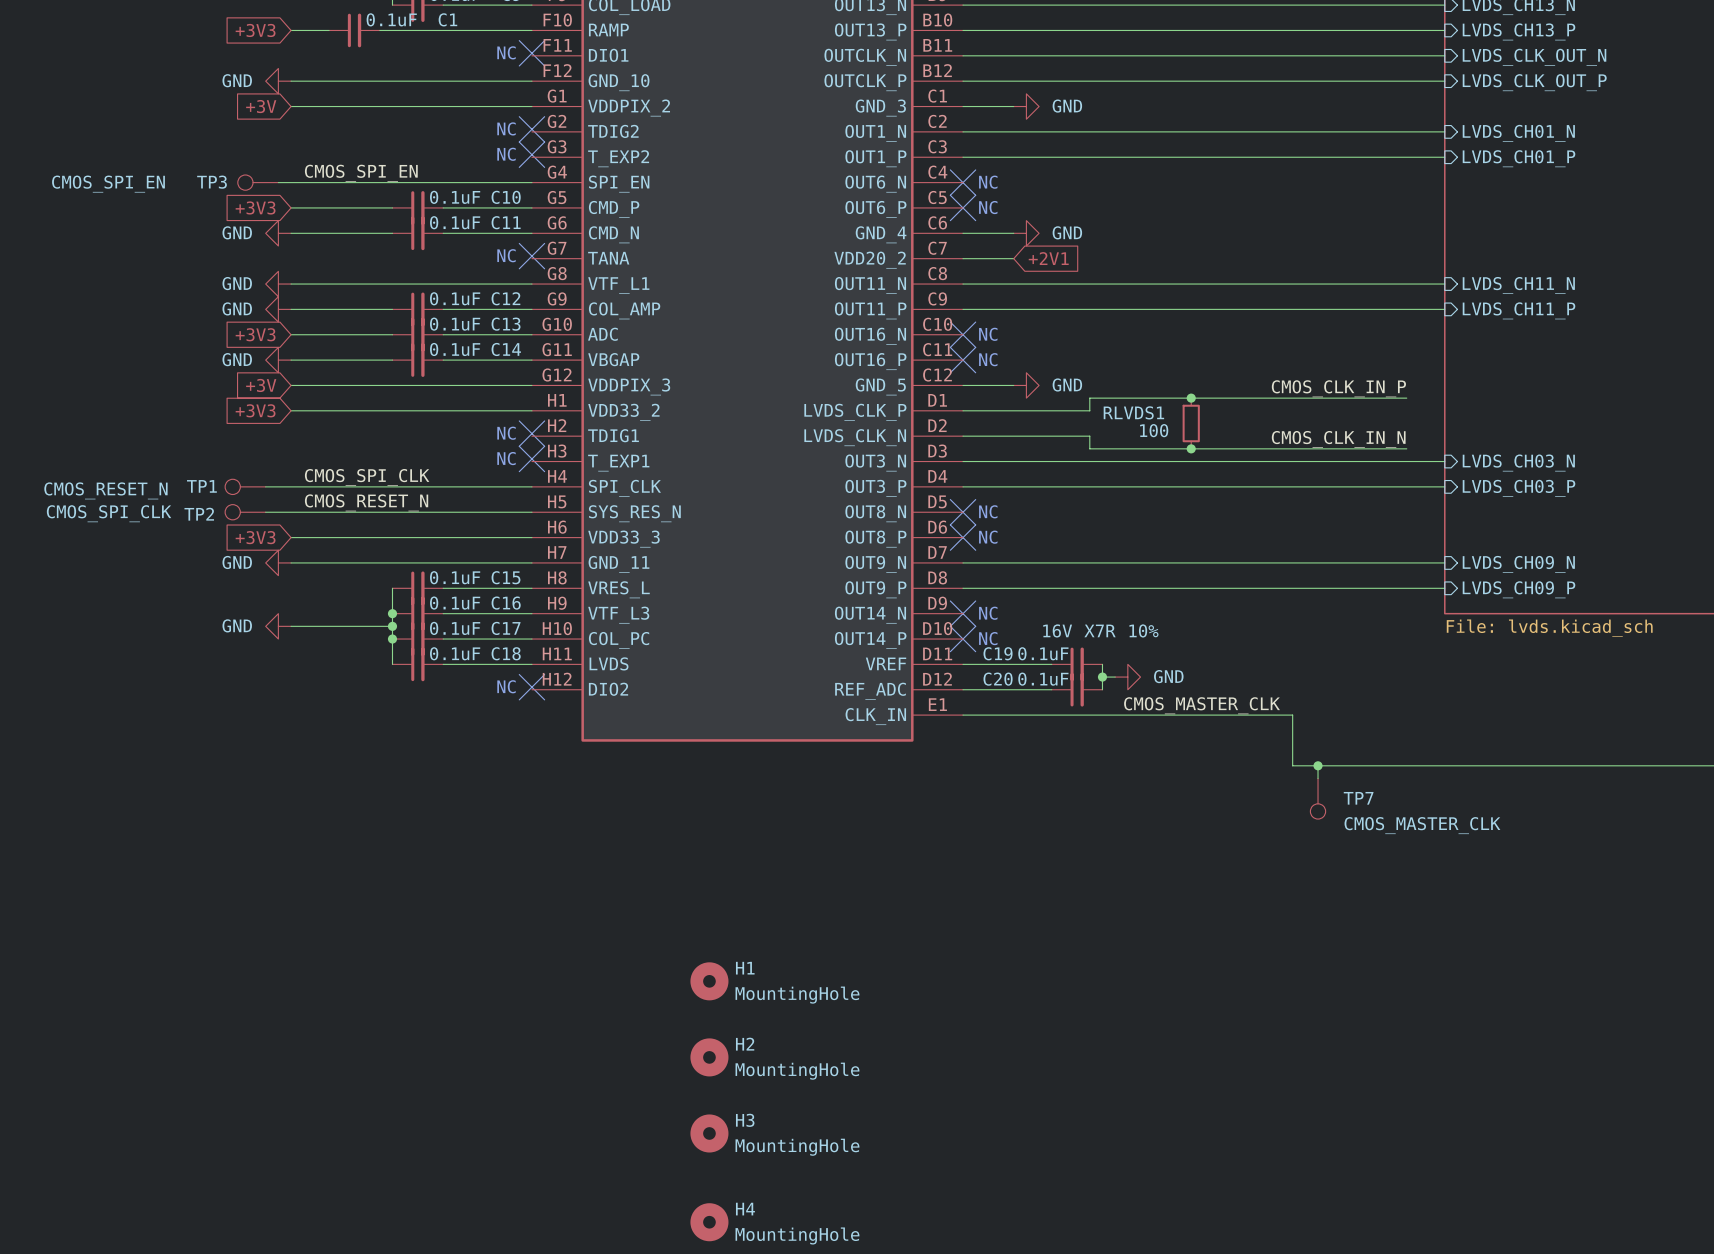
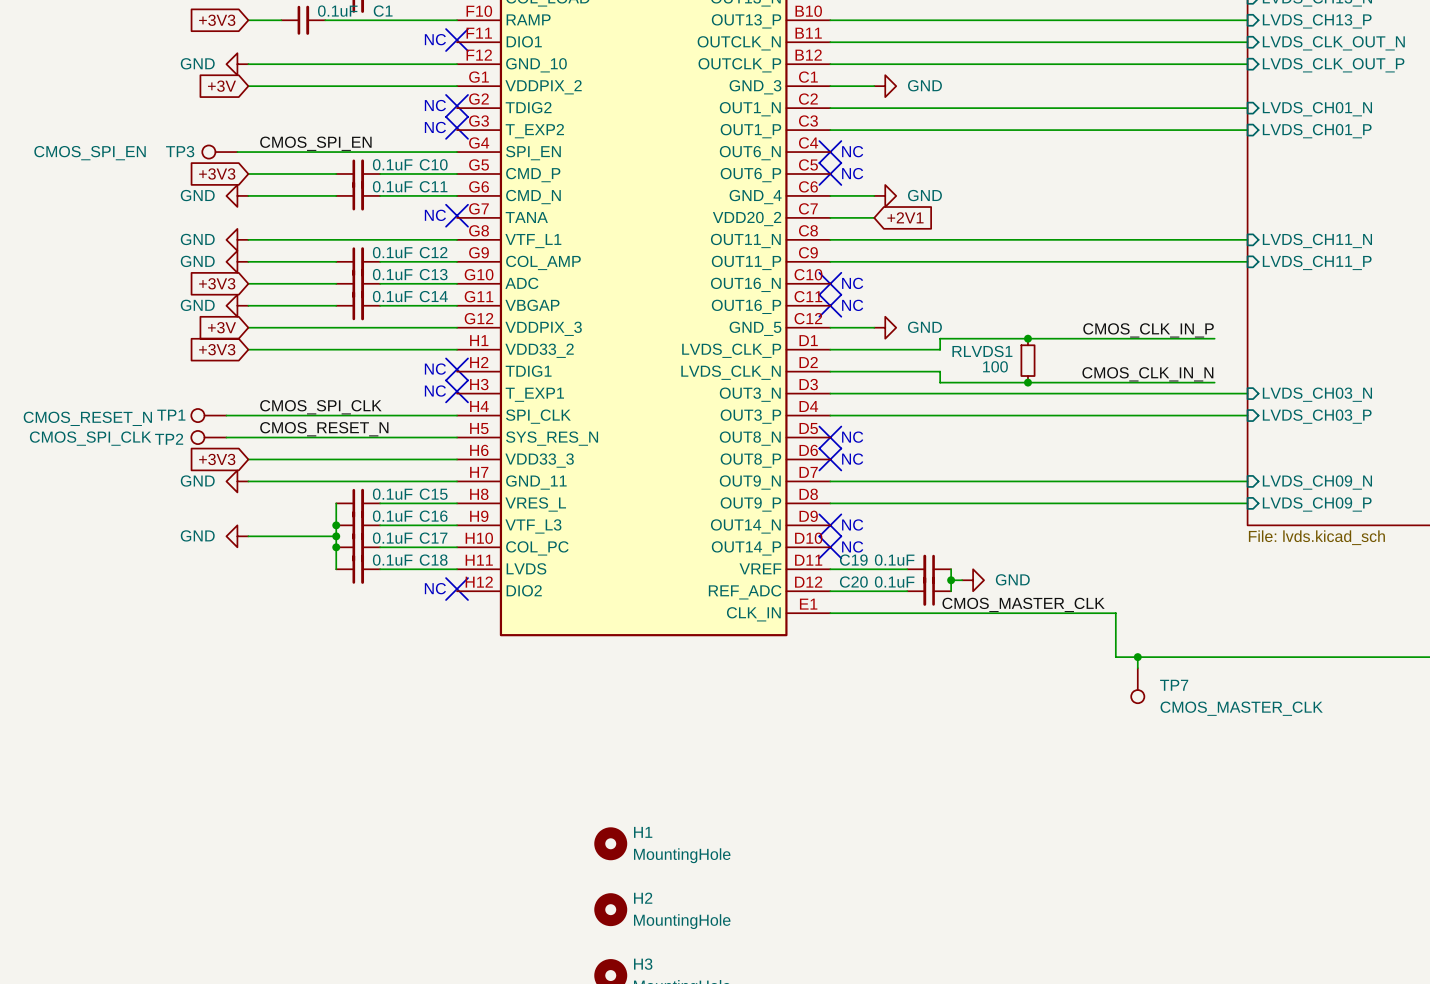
C19 text: 16V (1057, 630) -> none
C19 text: X7R (1100, 630) -> none
C19 text: 10% (1143, 630) -> none
C19 rotation: 0° (1077, 664) -> 180° (929, 569)
C20 rotation: 0° (1077, 689) -> 180° (929, 591)

